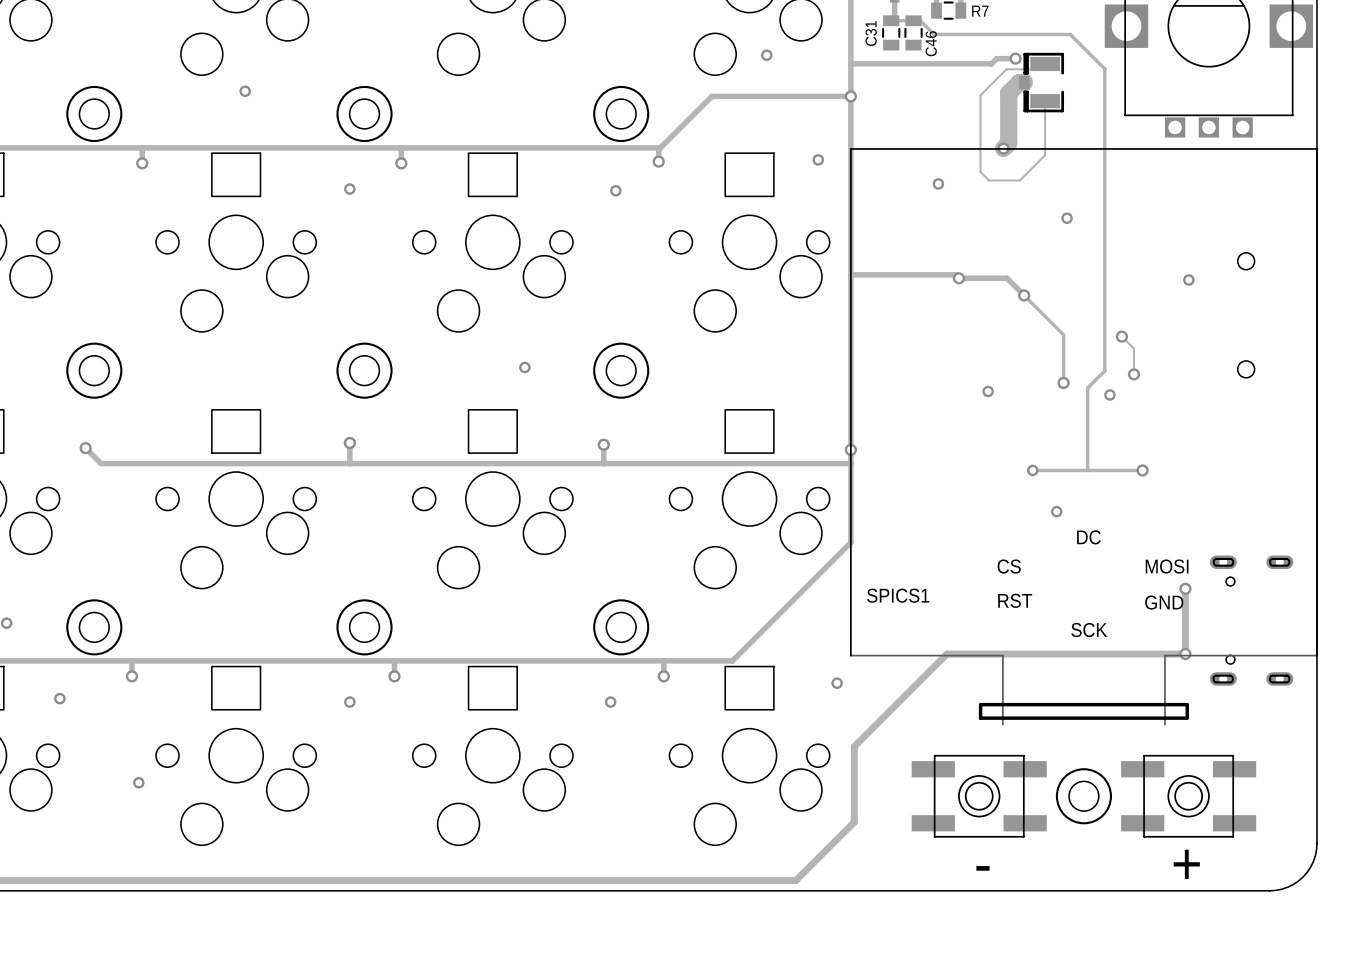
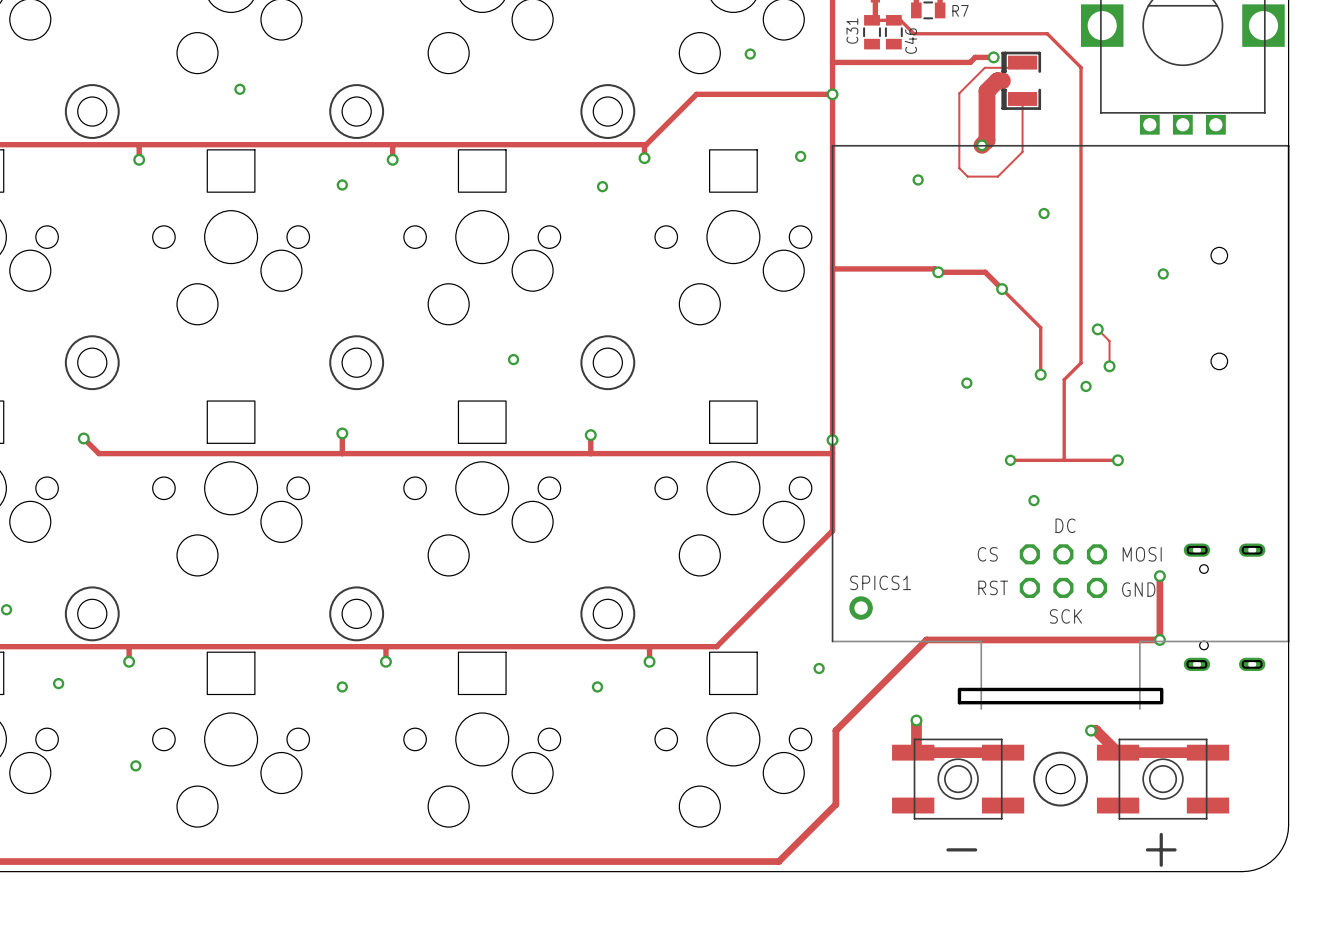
part: none -> (1063, 571)
part: none -> (861, 608)
track: none -> (916, 720) (916, 749) (913, 752) (1003, 752)
via: none -> (916, 720)
track: none -> (1091, 730) (1096, 730) (1118, 752) (1207, 752)
via: none -> (1091, 730)

